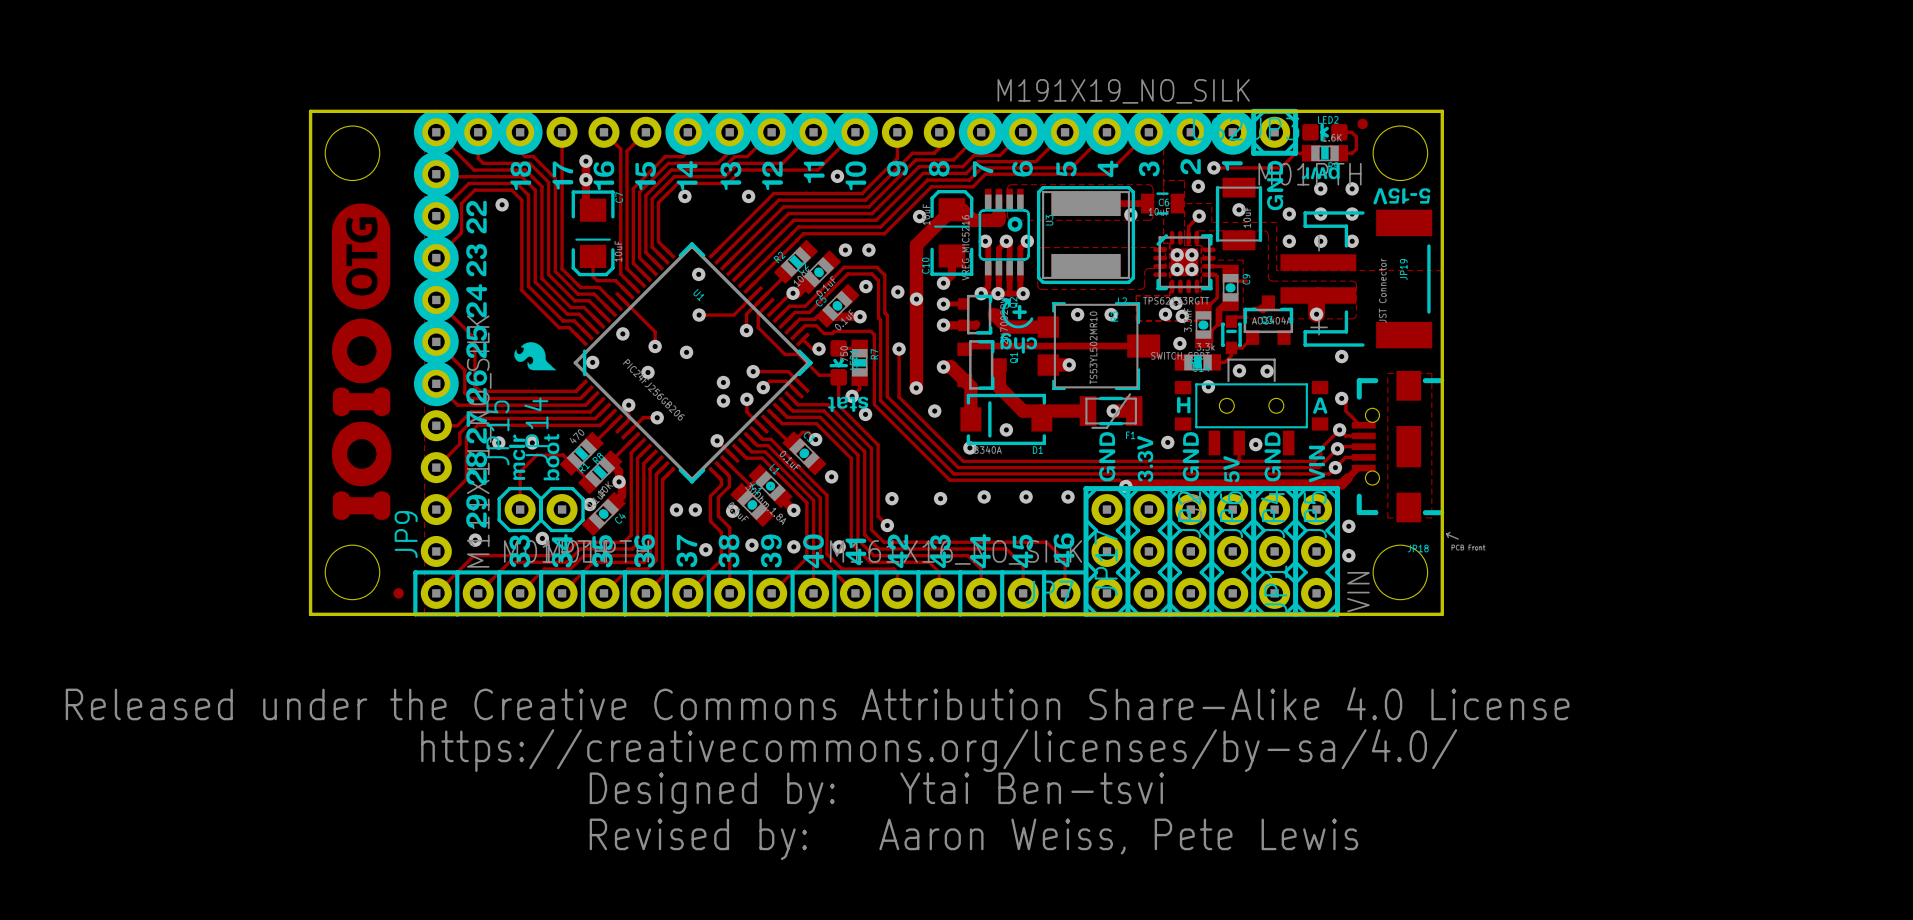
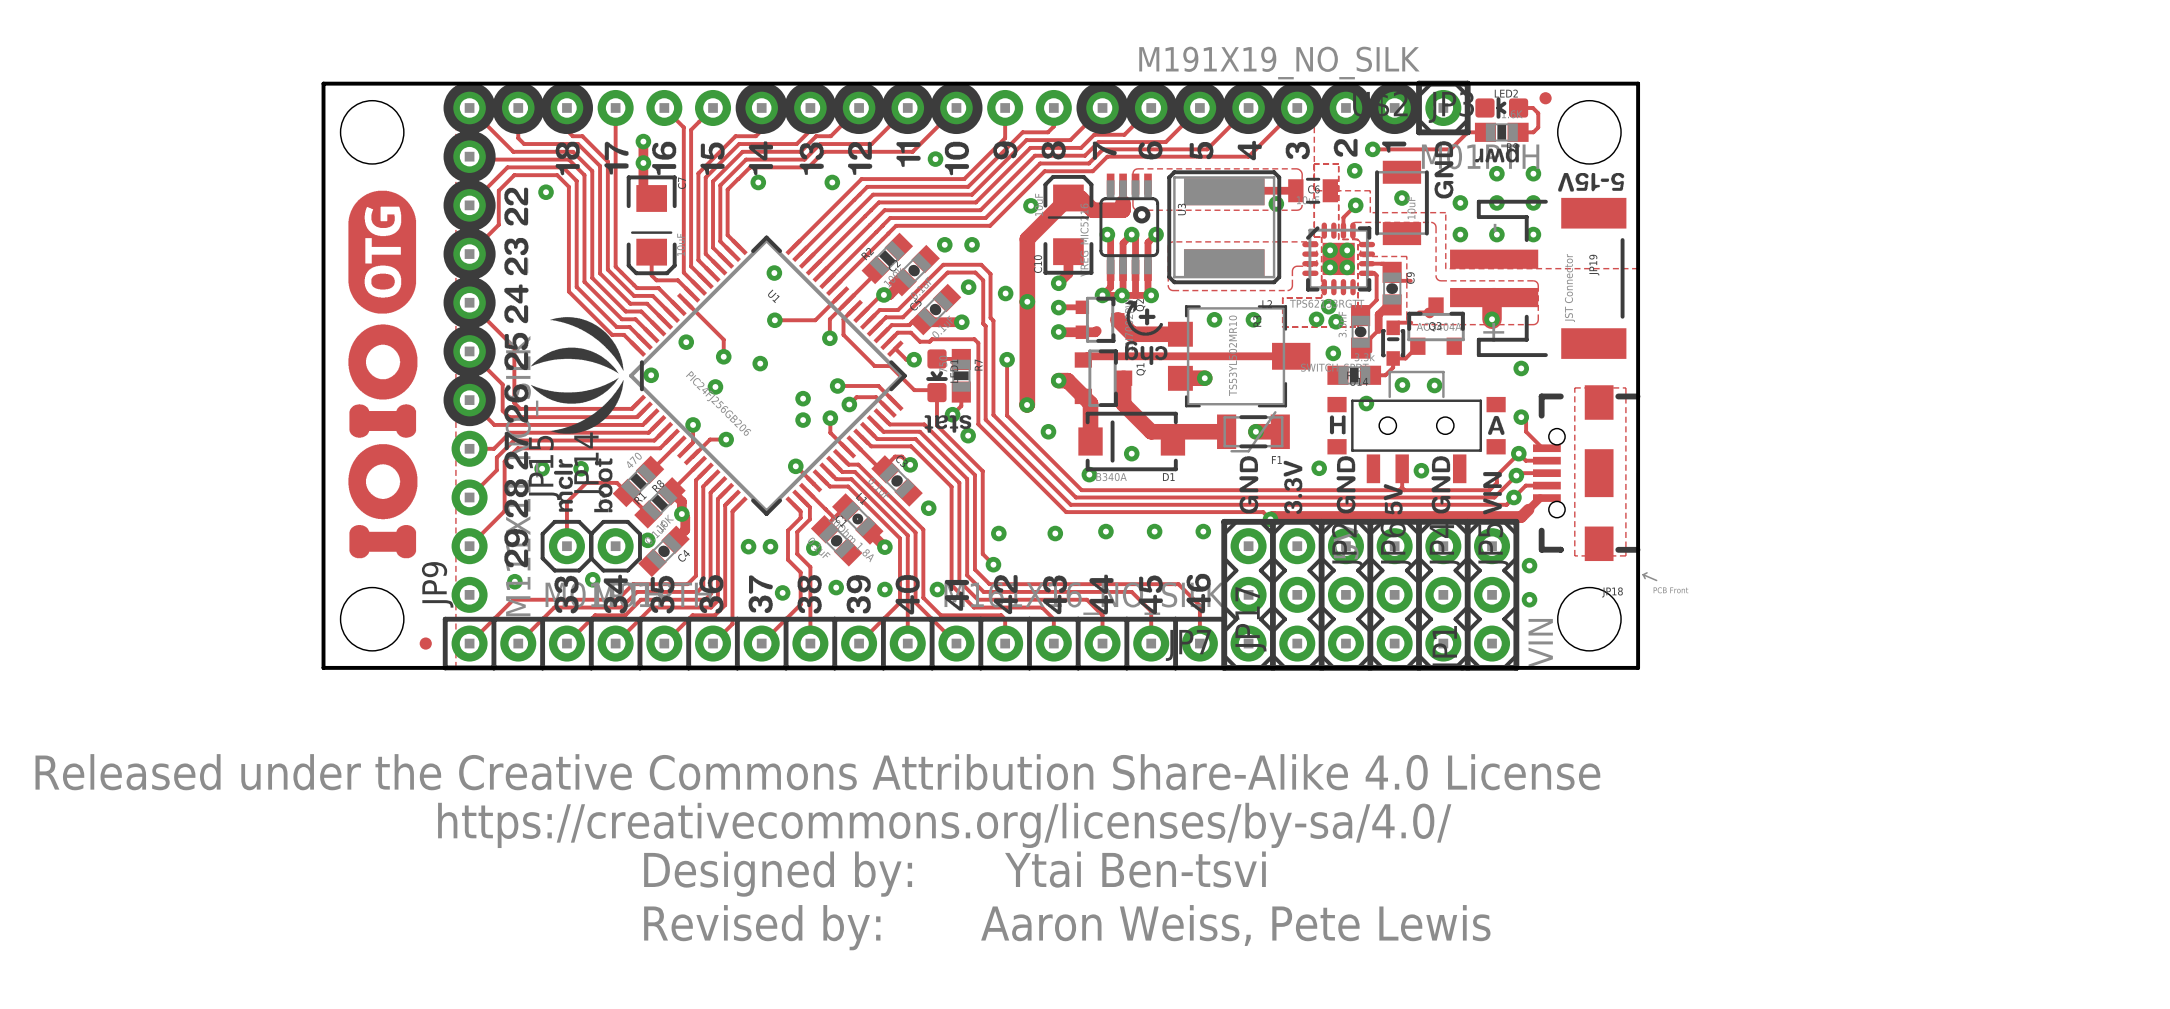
drawing shape: [514, 342, 557, 371] -> [531, 316, 624, 434]

